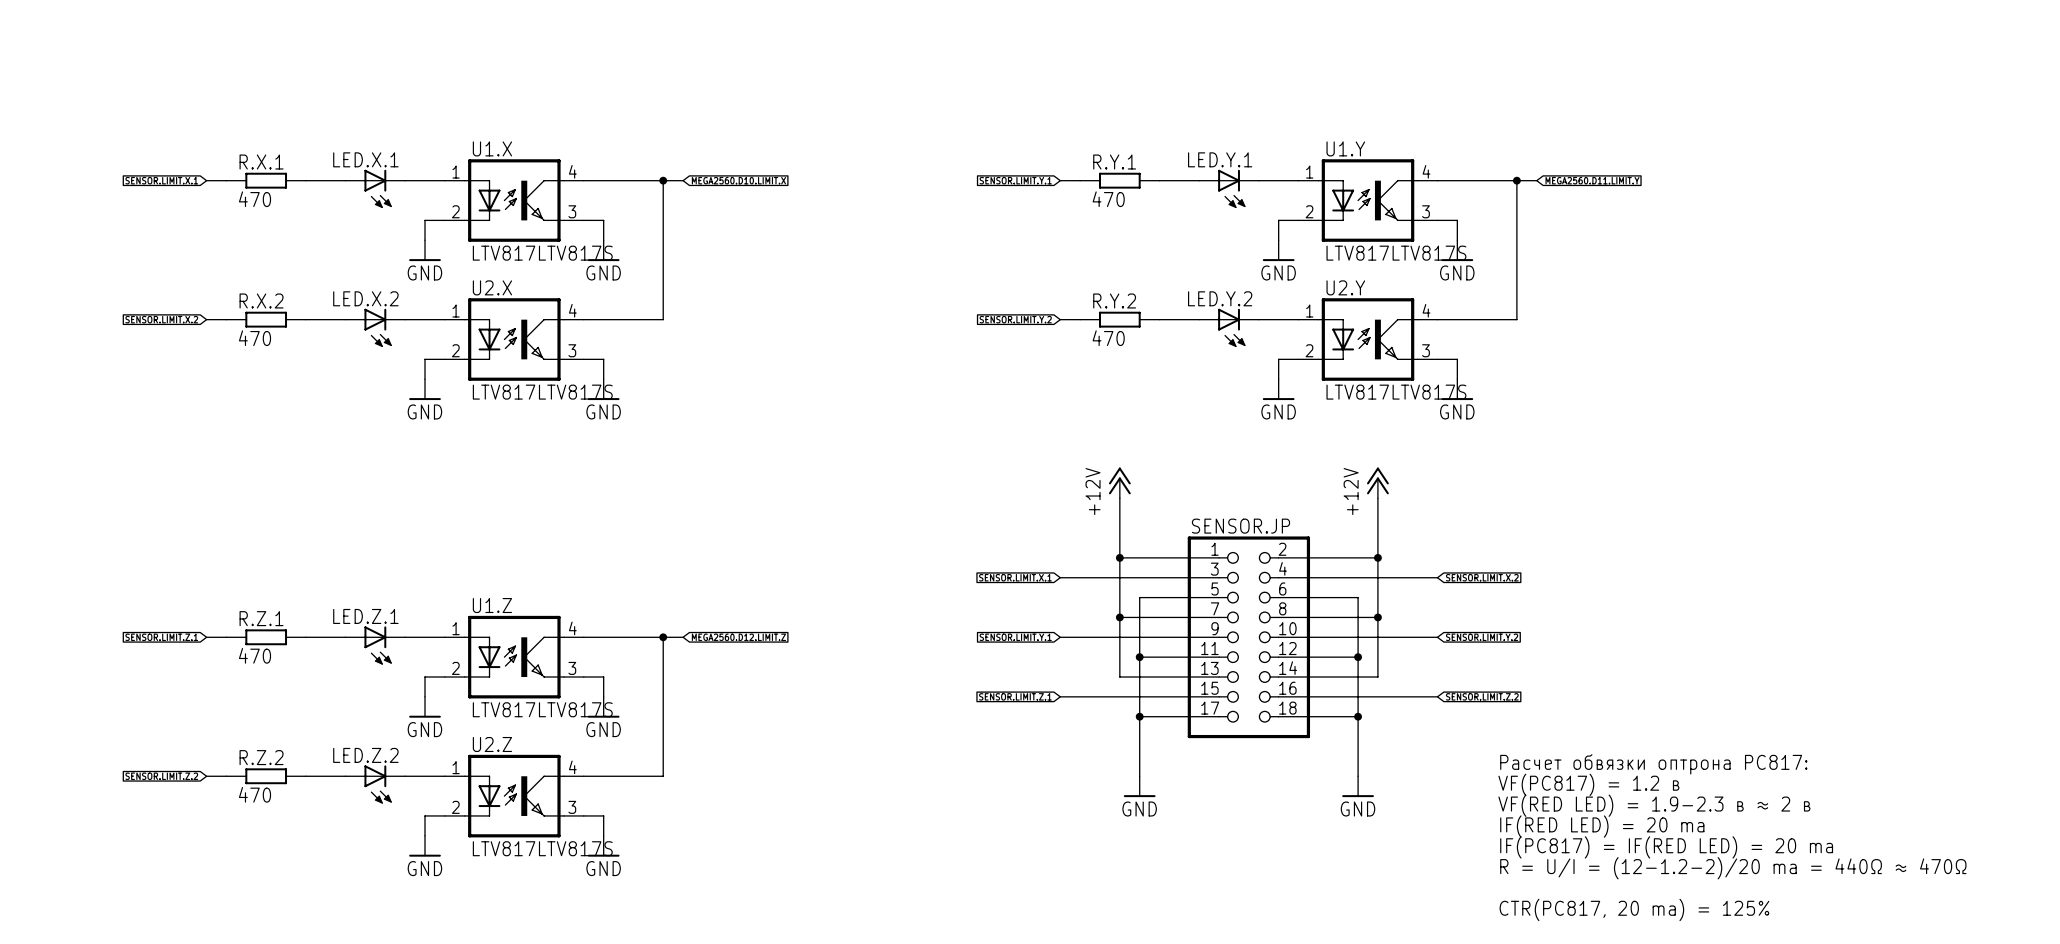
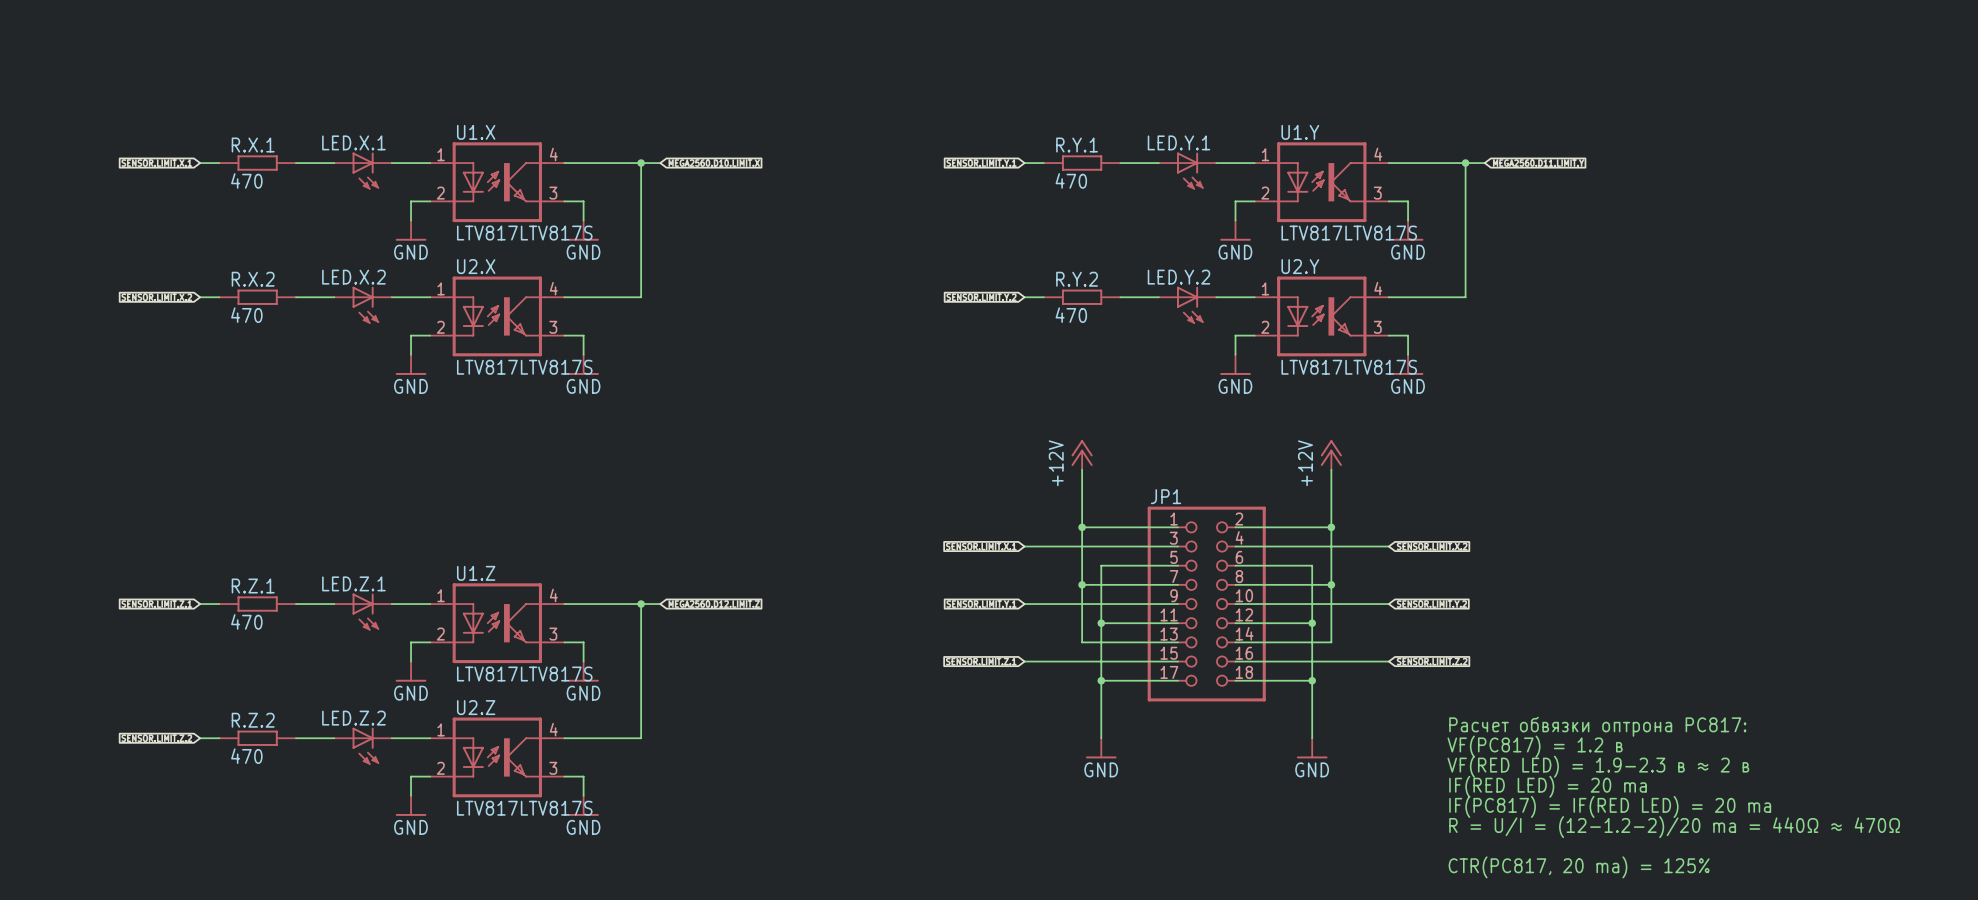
SENSOR.JP name: SENSOR.JP (1240, 526) -> JP1 (1166, 496)

